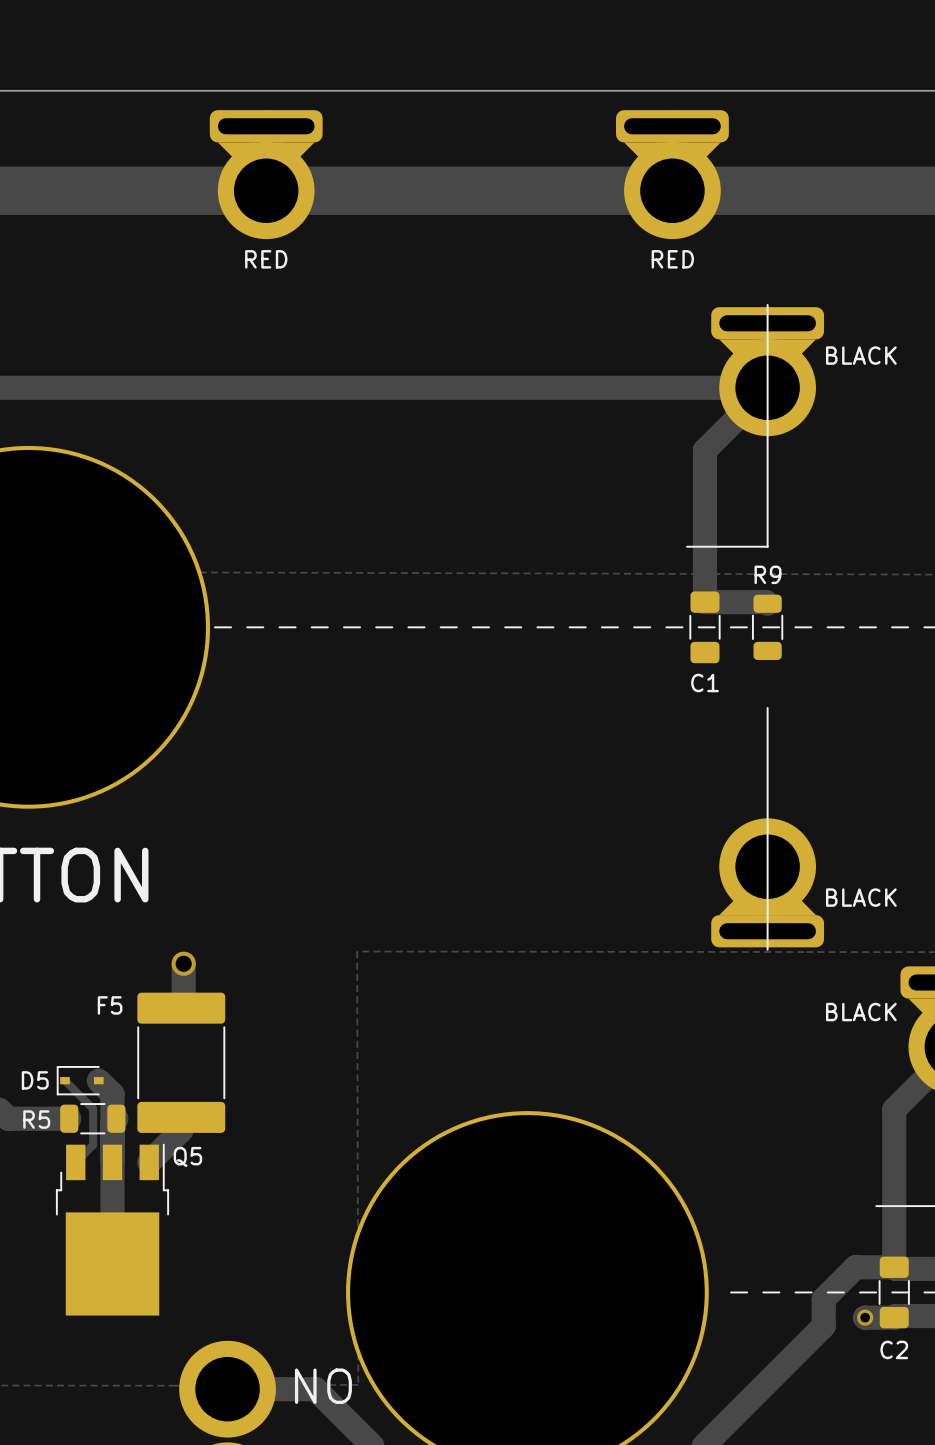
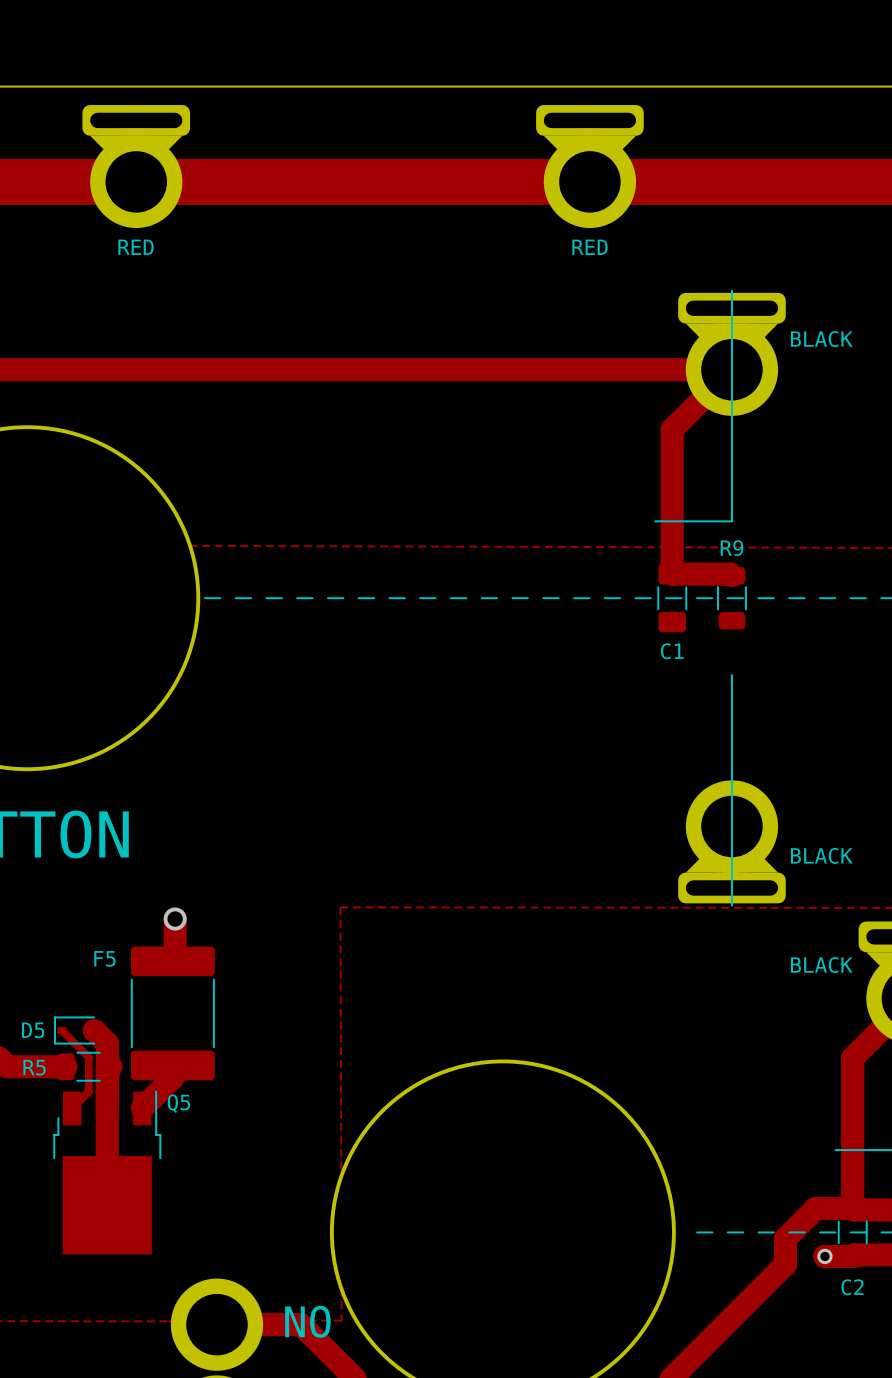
RED position: (266, 174) -> (136, 166)
RED position: (672, 174) -> (589, 166)

